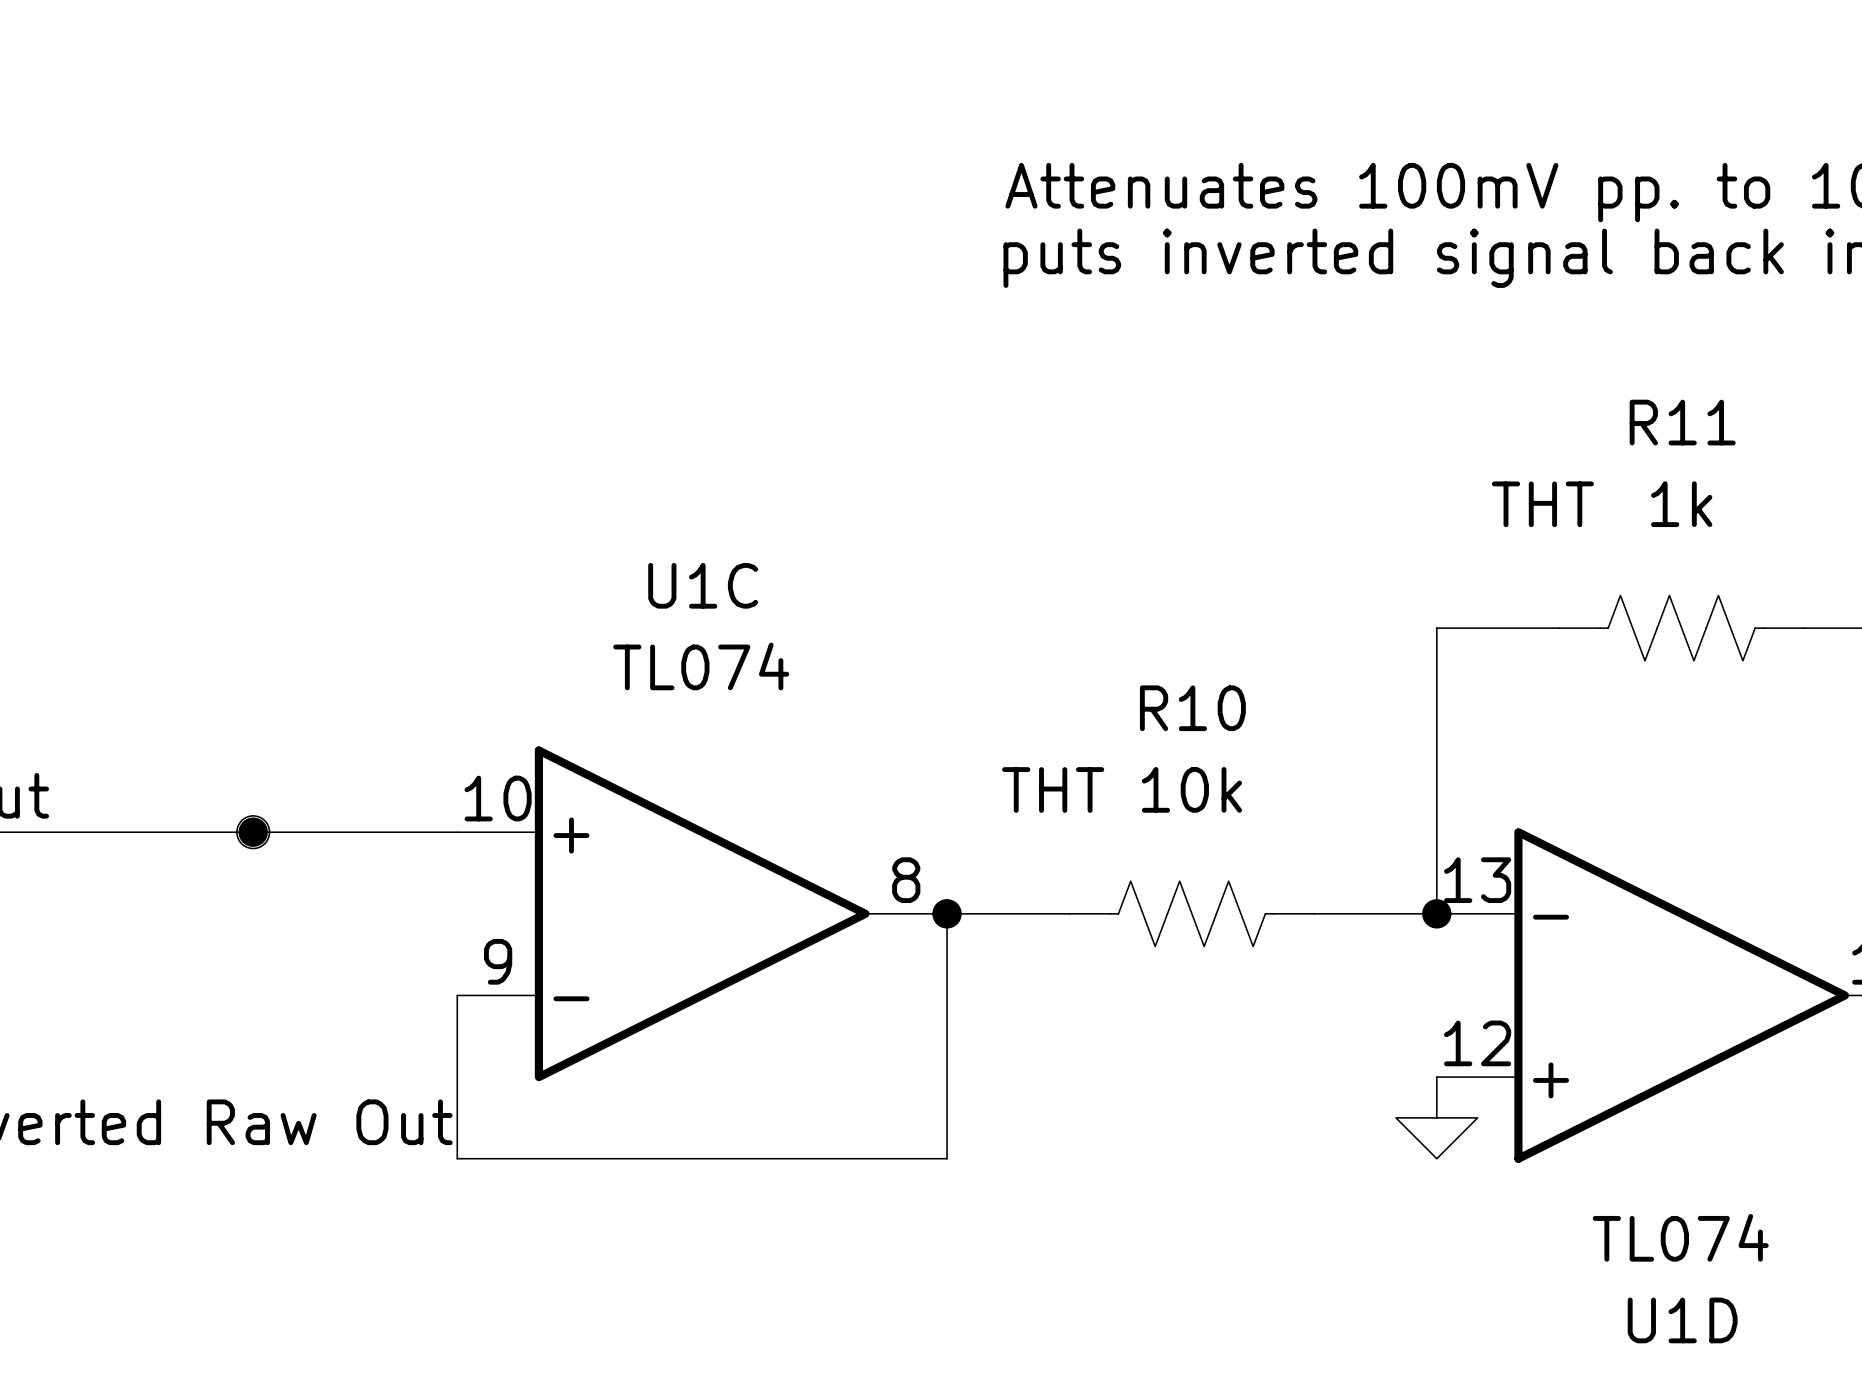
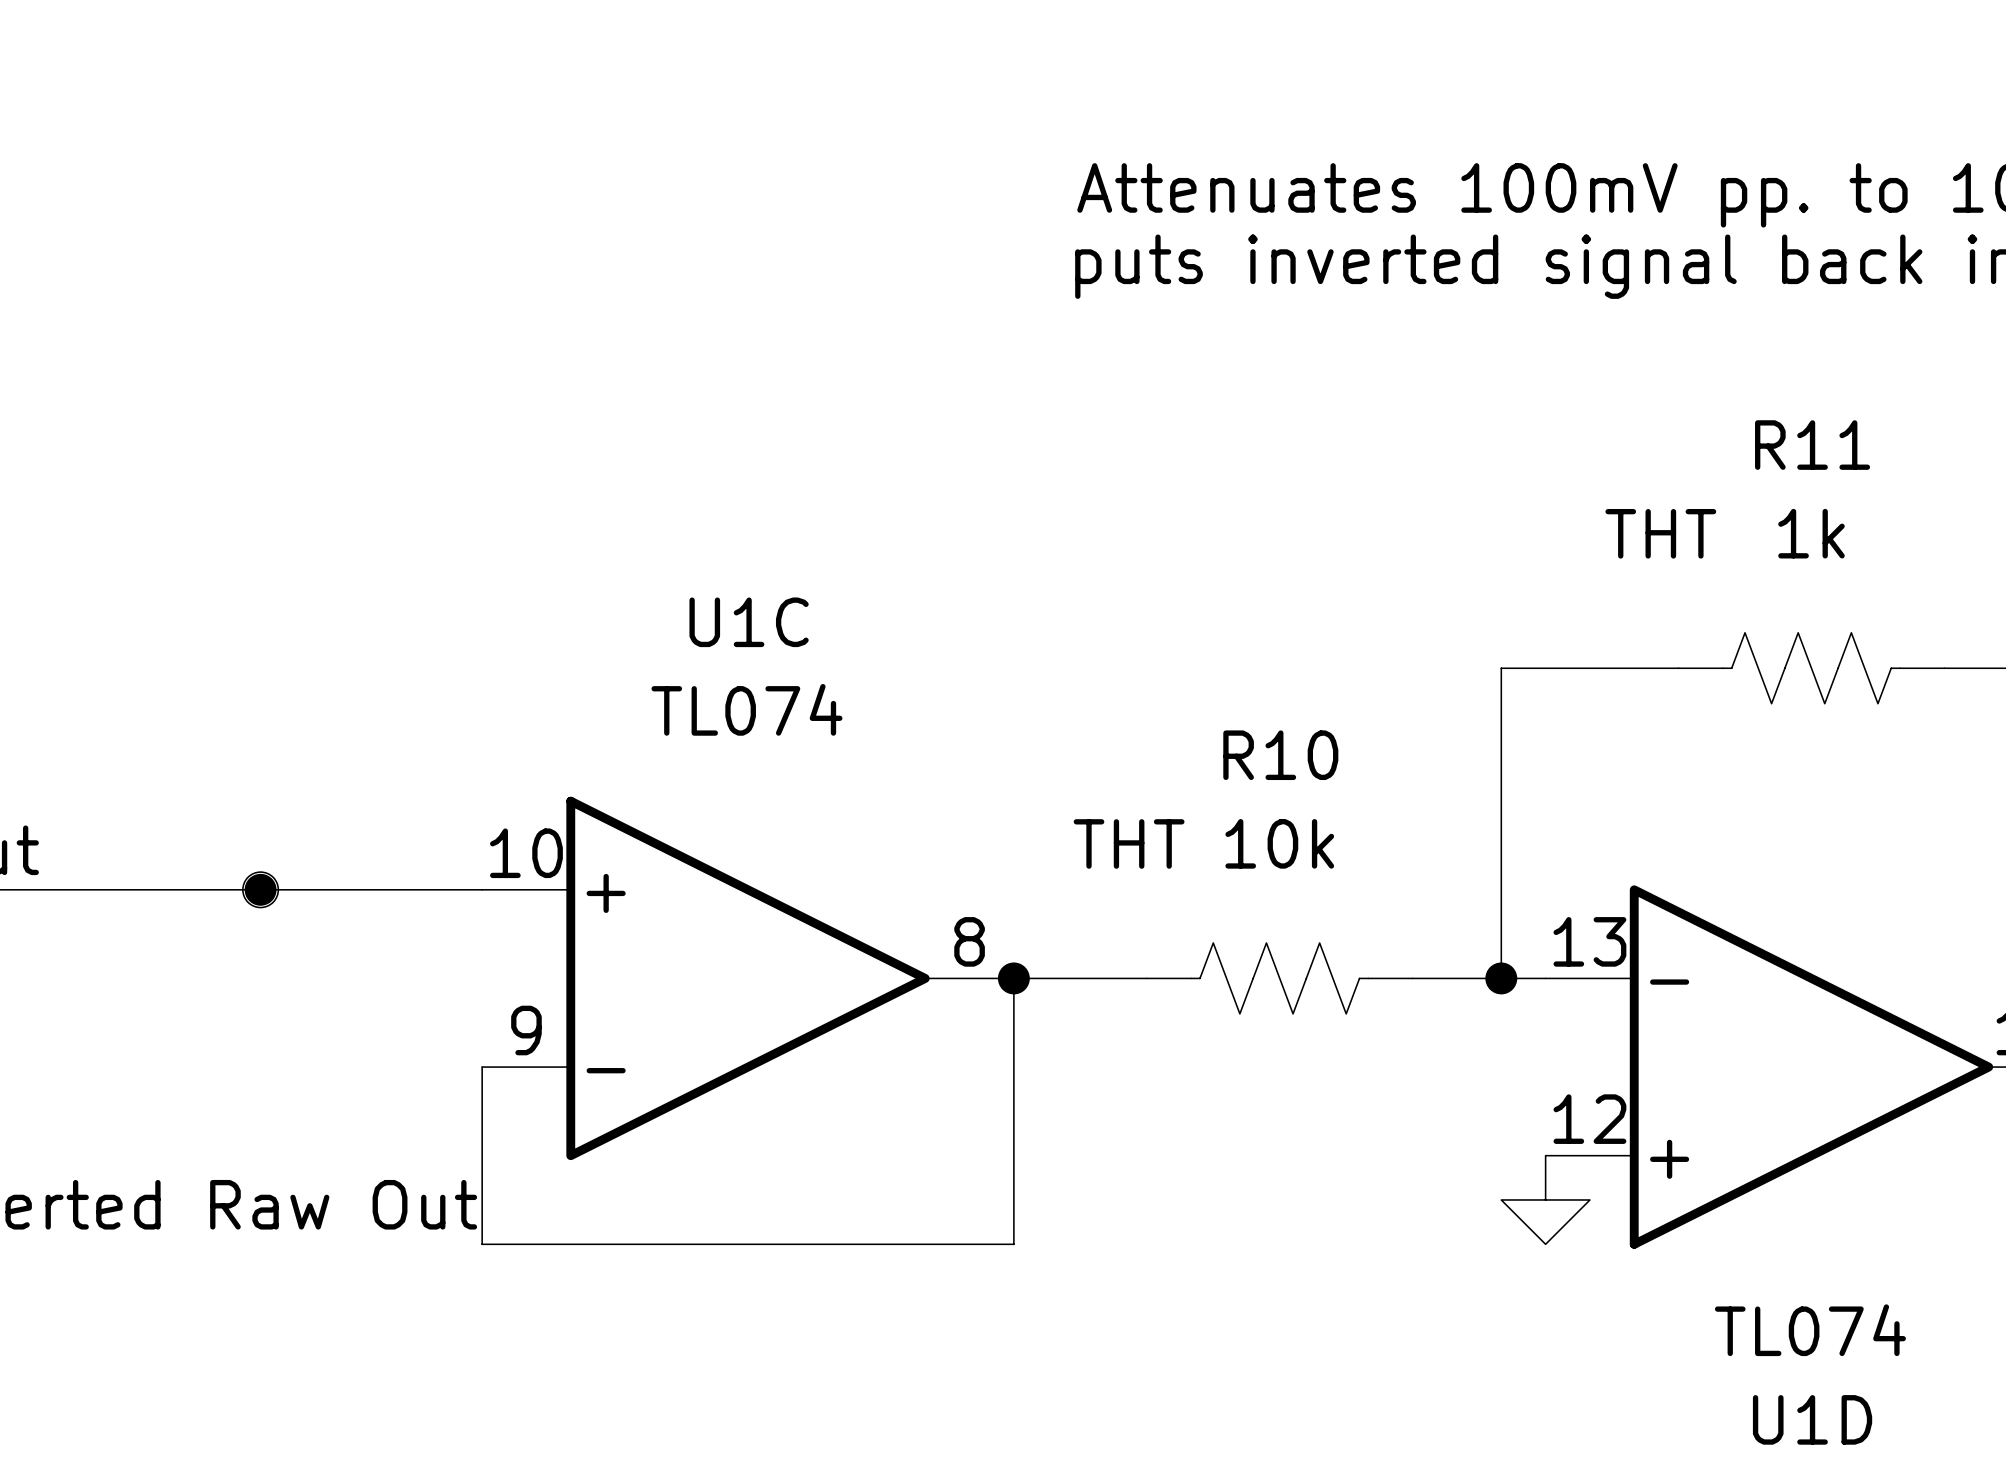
wire: (1436, 628) (1436, 913) -> (1545, 668) (1501, 668) (1501, 978)
junction position: (1436, 913) -> (1501, 978)

